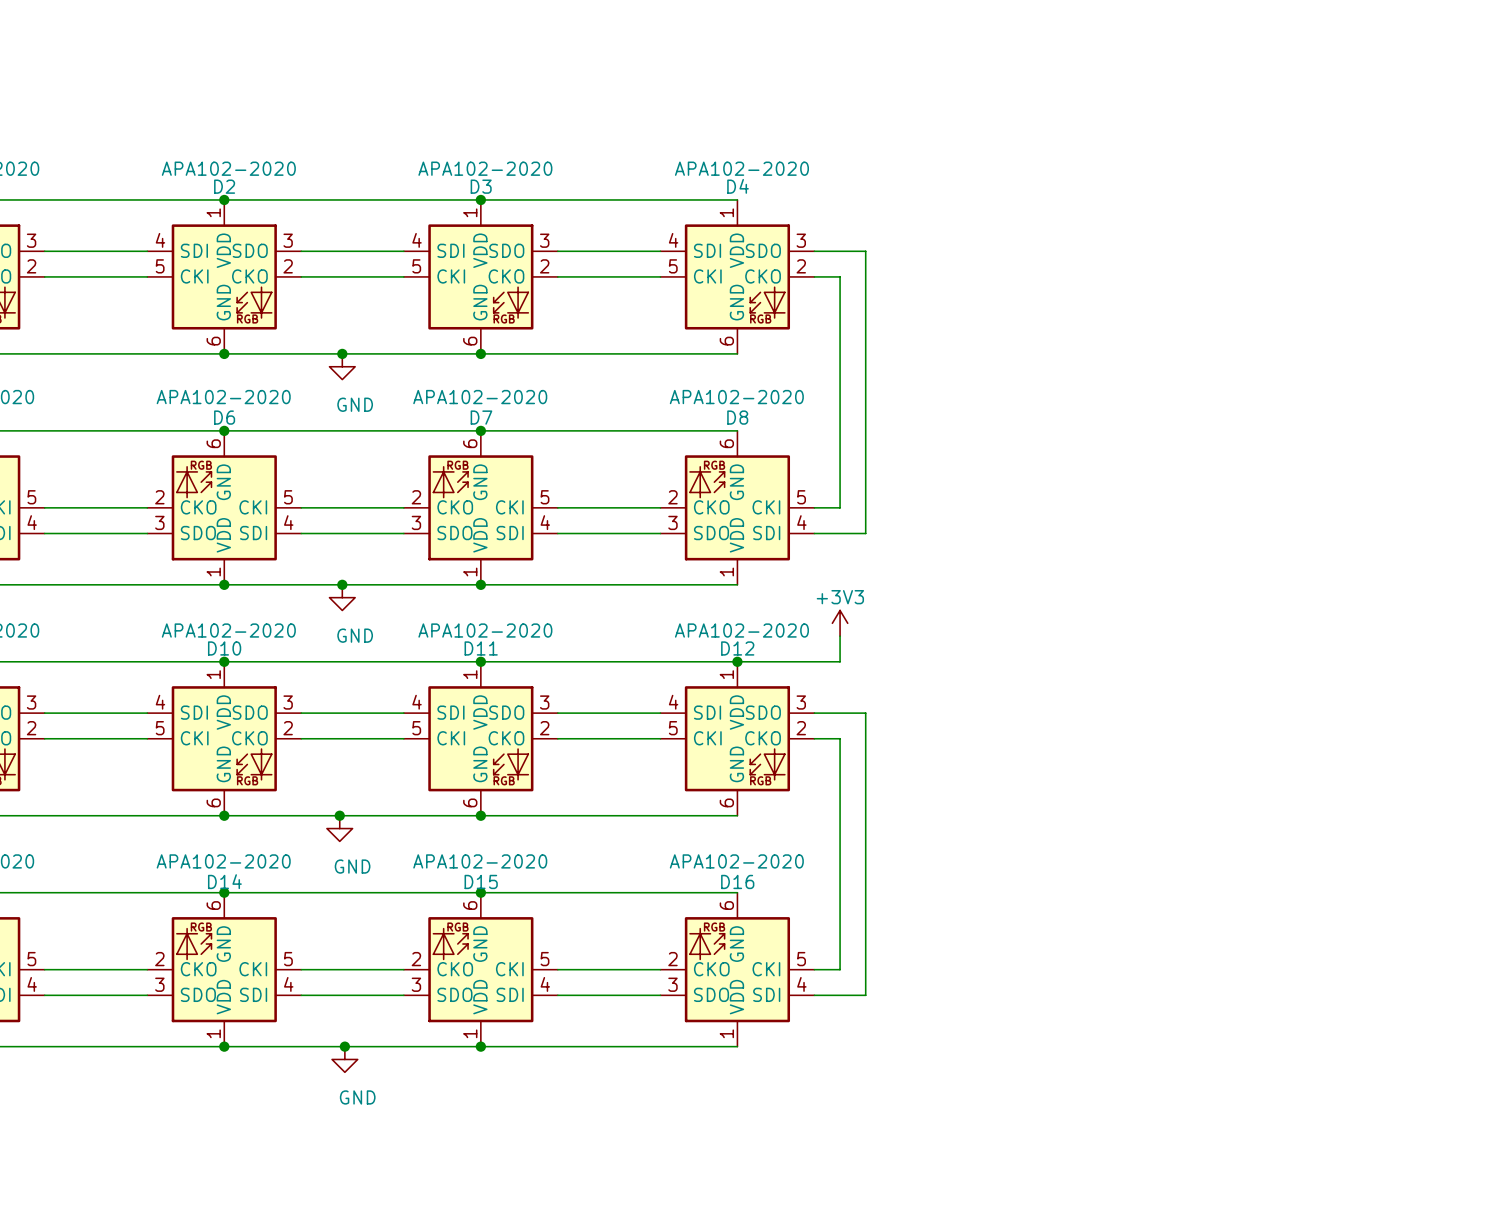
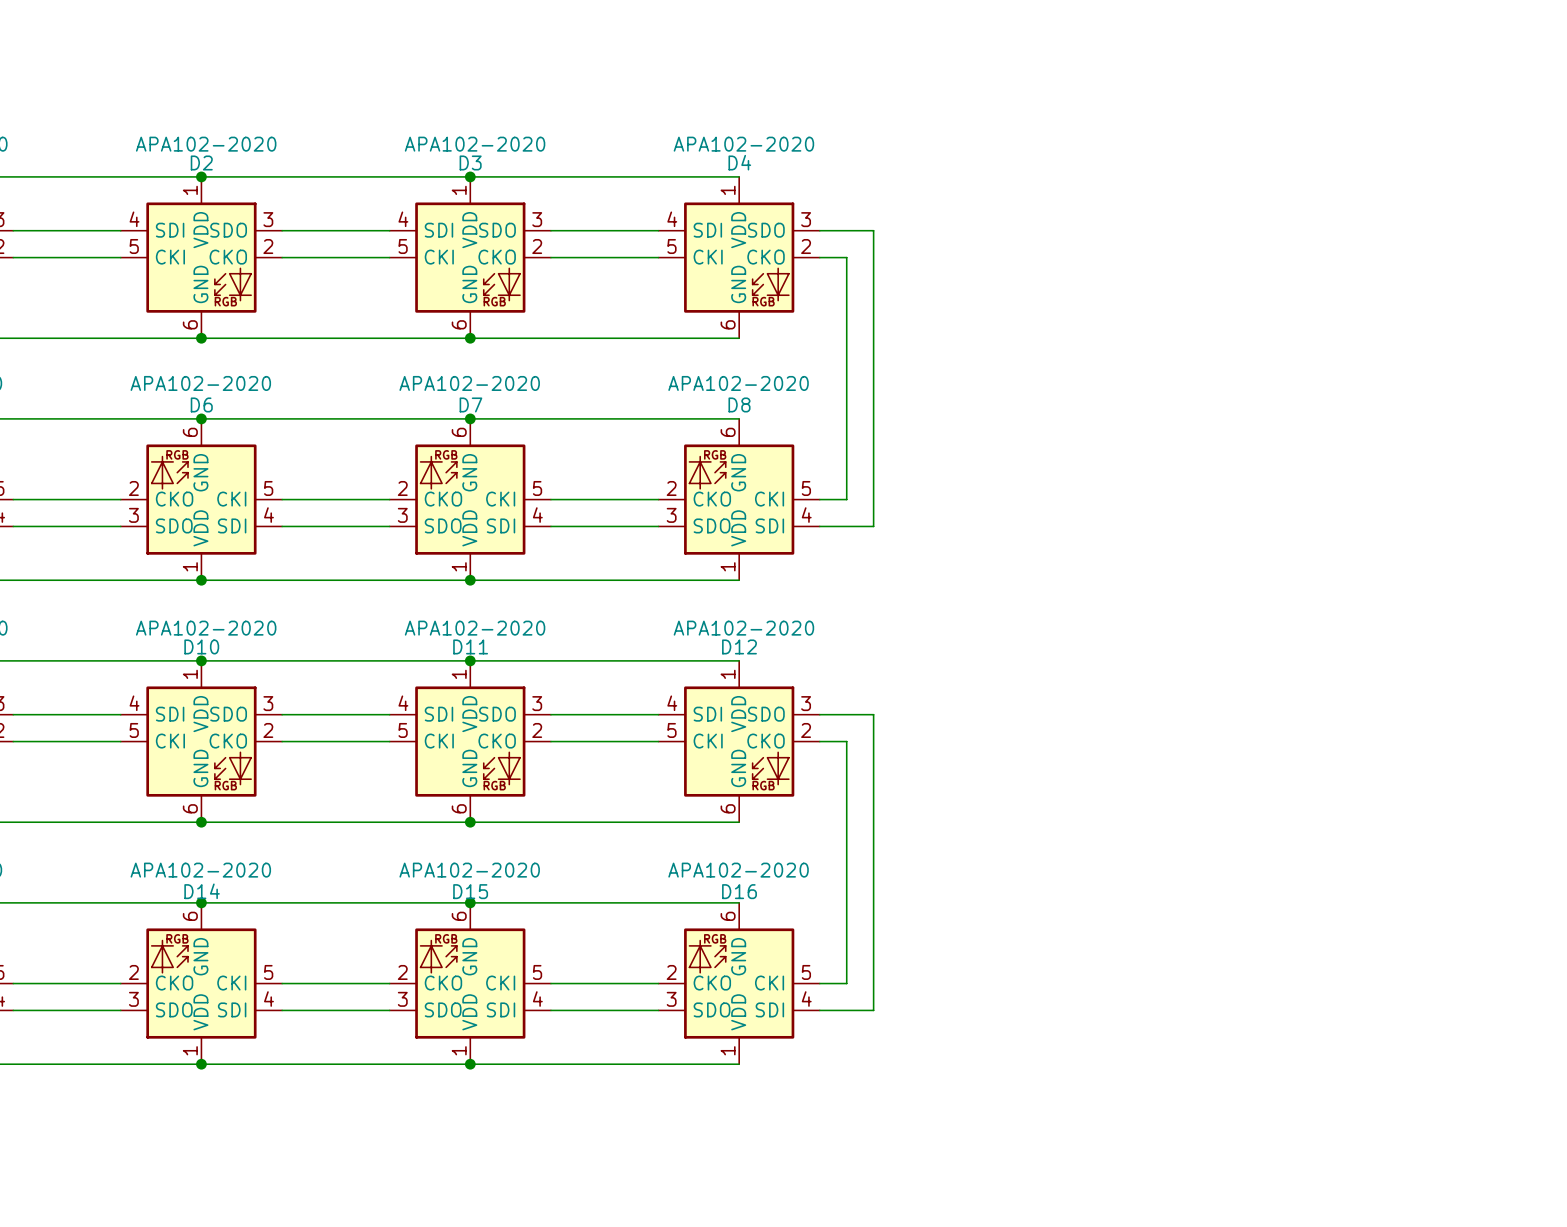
junction: (342, 353) -> none
power symbol: GND (342, 366) -> none
junction: (342, 584) -> none
power symbol: GND (342, 597) -> none
power symbol: +3V3 (840, 623) -> none
wire: (840, 636) (840, 661) (737, 661) -> none
junction: (737, 661) -> none
junction: (339, 815) -> none
power symbol: GND (339, 828) -> none
junction: (344, 1046) -> none
power symbol: GND (344, 1059) -> none

